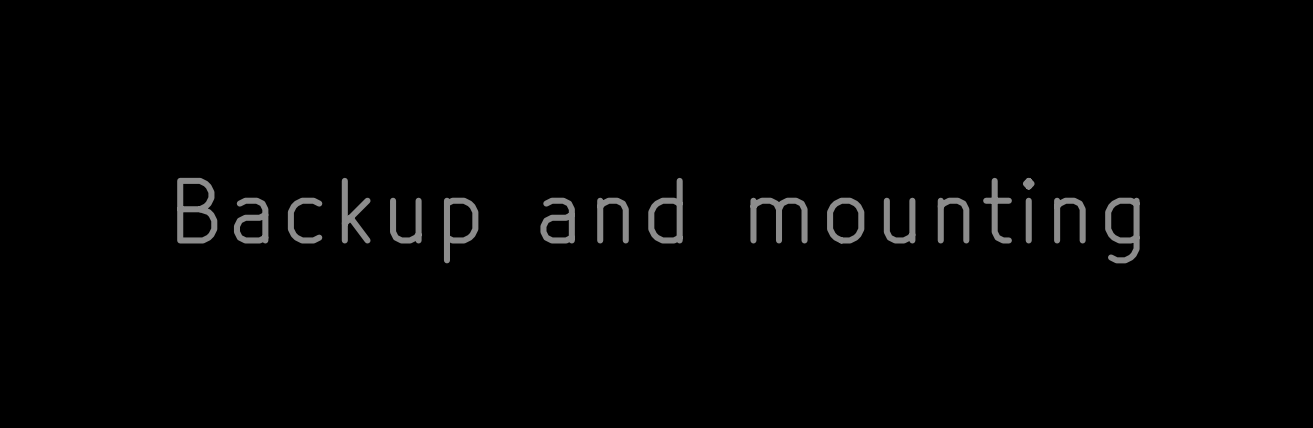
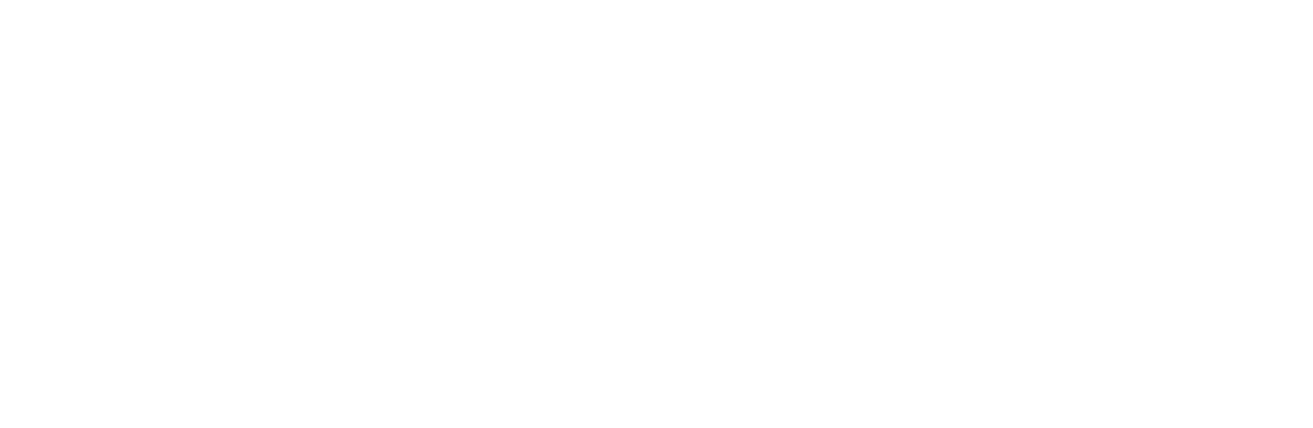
text: Backup and mounting (658, 220) -> none

